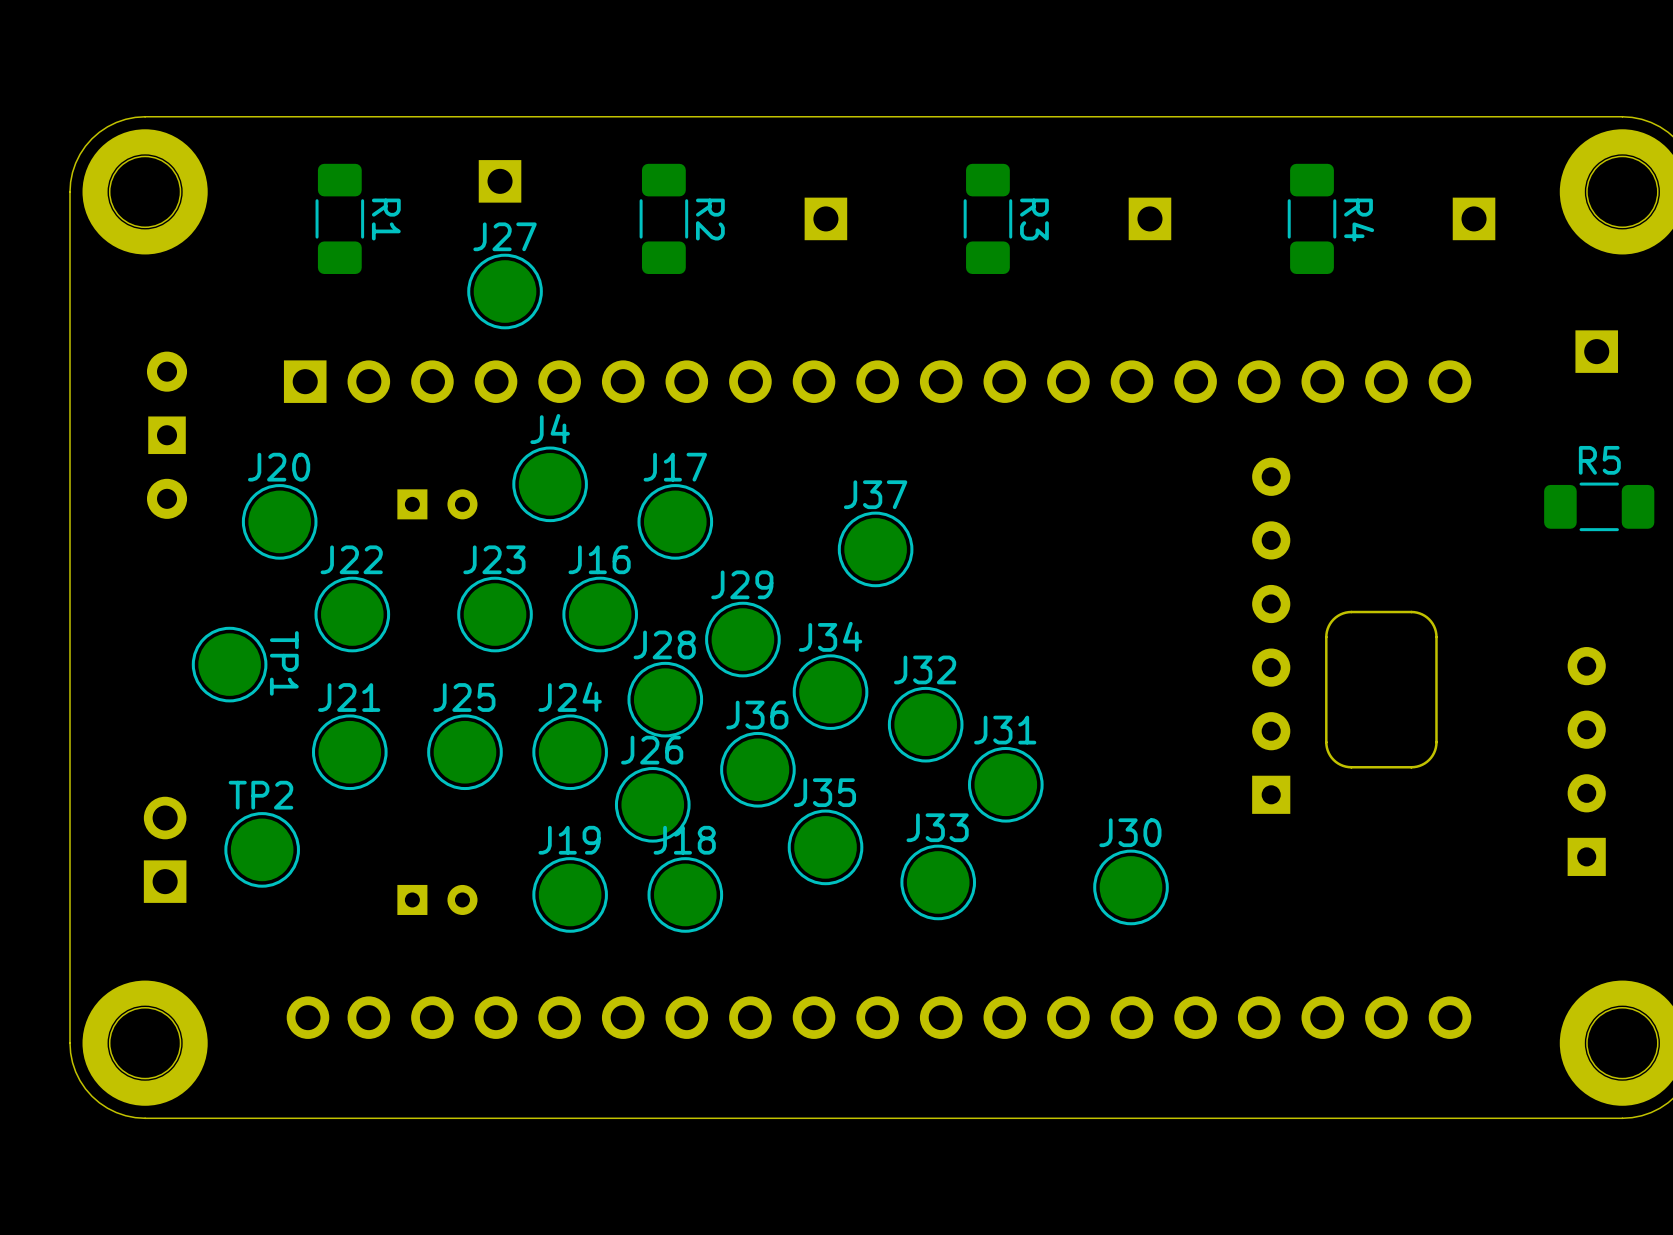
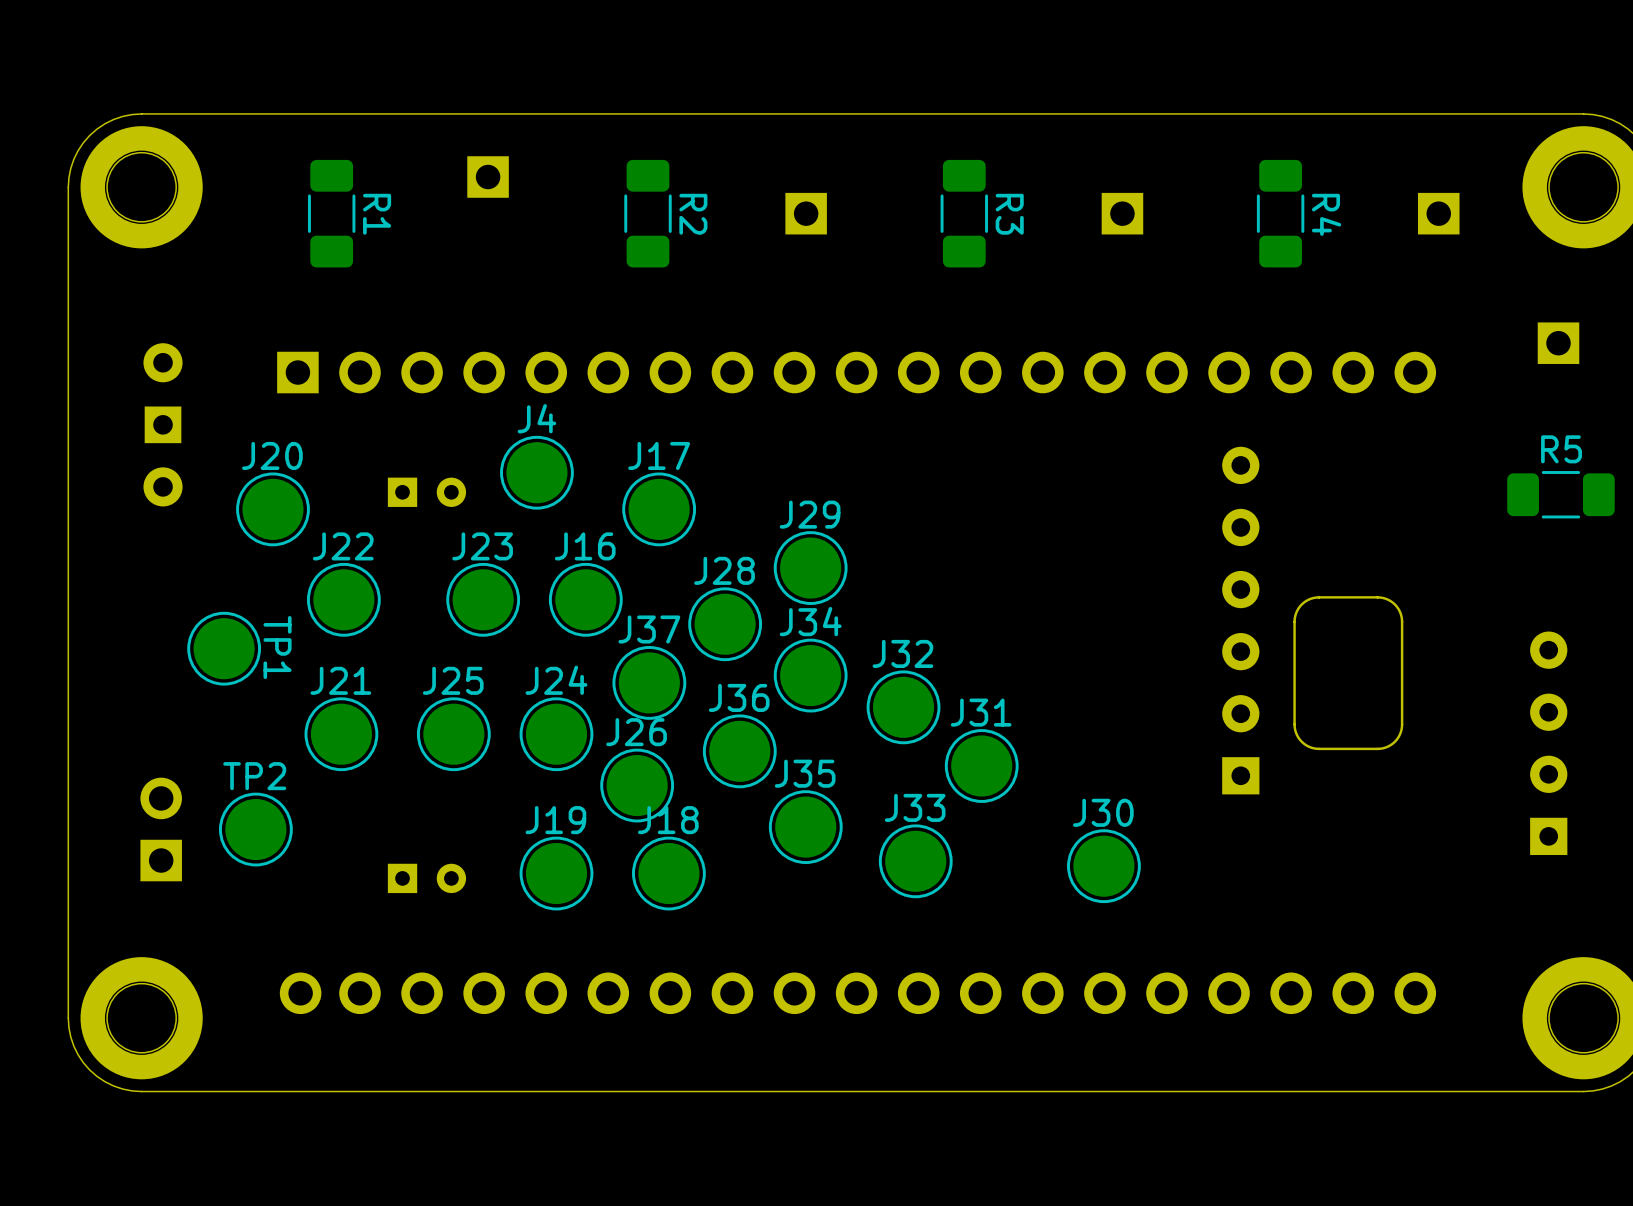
J27: (505, 291) -> none
J37: (875, 549) -> none
J29: none -> (810, 568)
J29 name: J29 (742, 584) -> J28 (724, 570)
J28 name: J28 (664, 644) -> J37 (649, 629)

